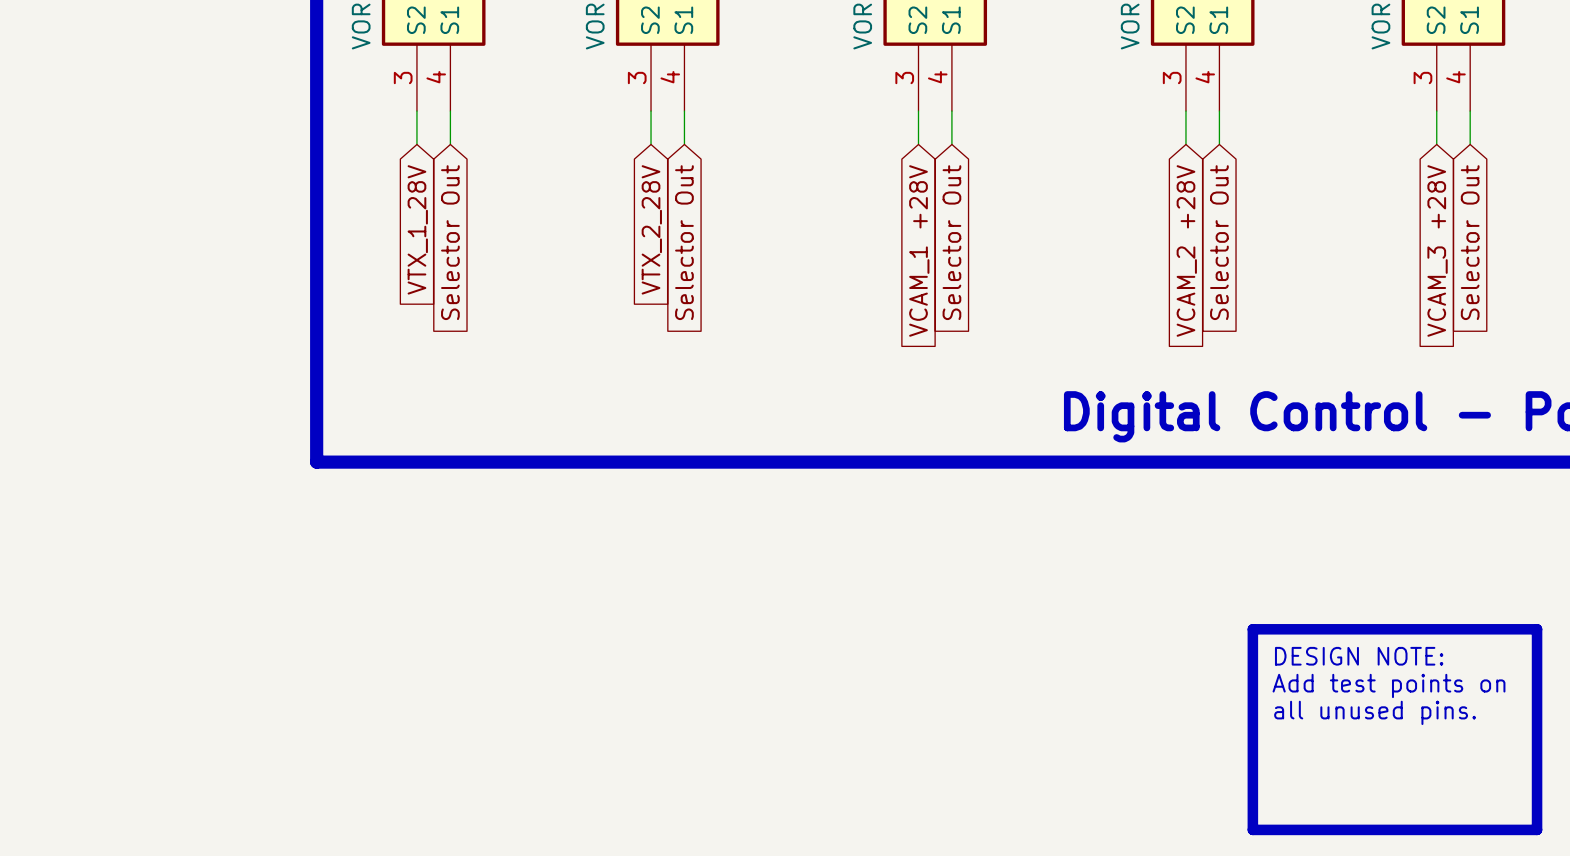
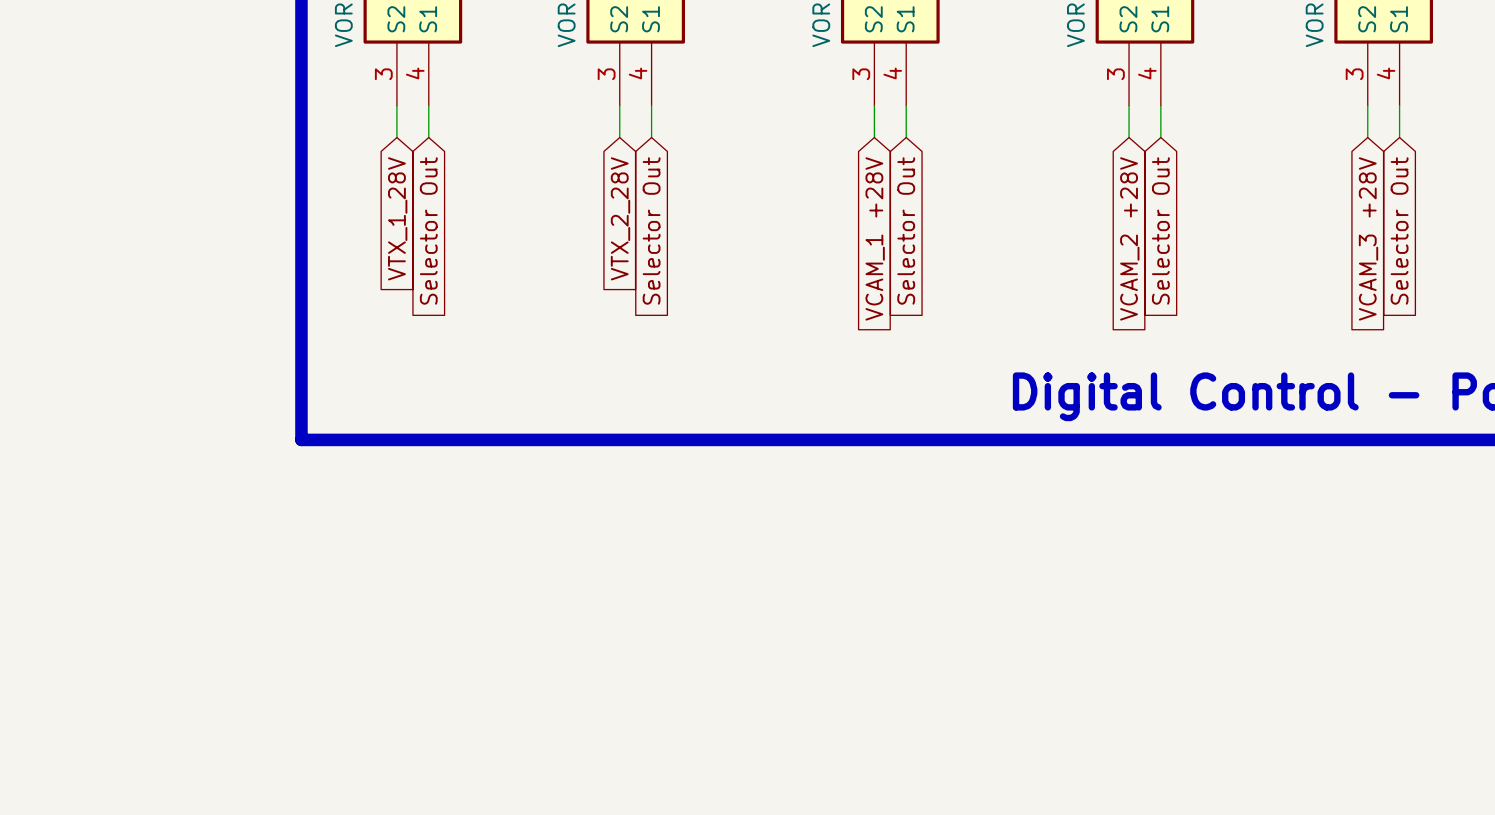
line: (1252, 629) (1537, 629) (1537, 829) (1252, 829) (1252, 629) -> none
text: DESIGN NOTE: (1359, 656) -> none
text: Add test points on (1389, 685) -> none
text: all unused pins. (1375, 712) -> none

